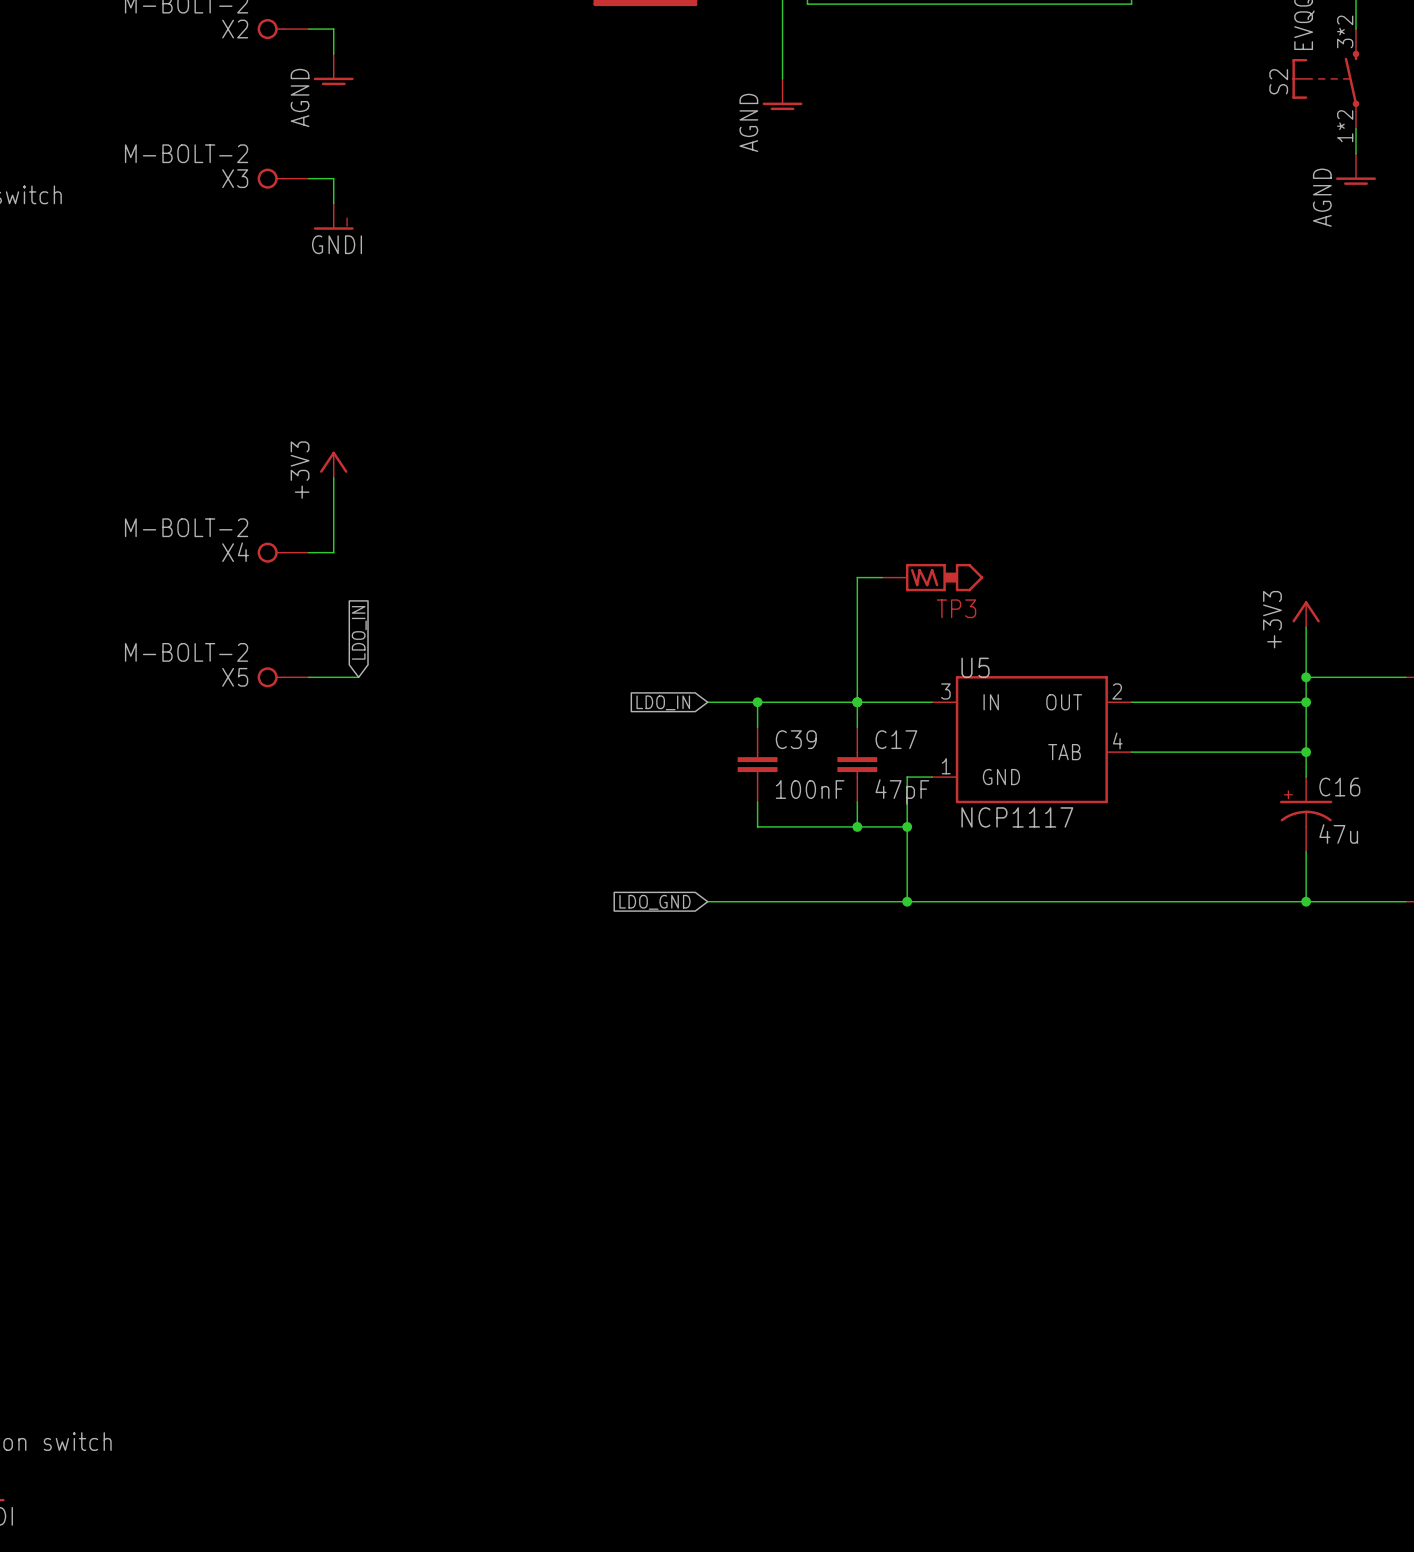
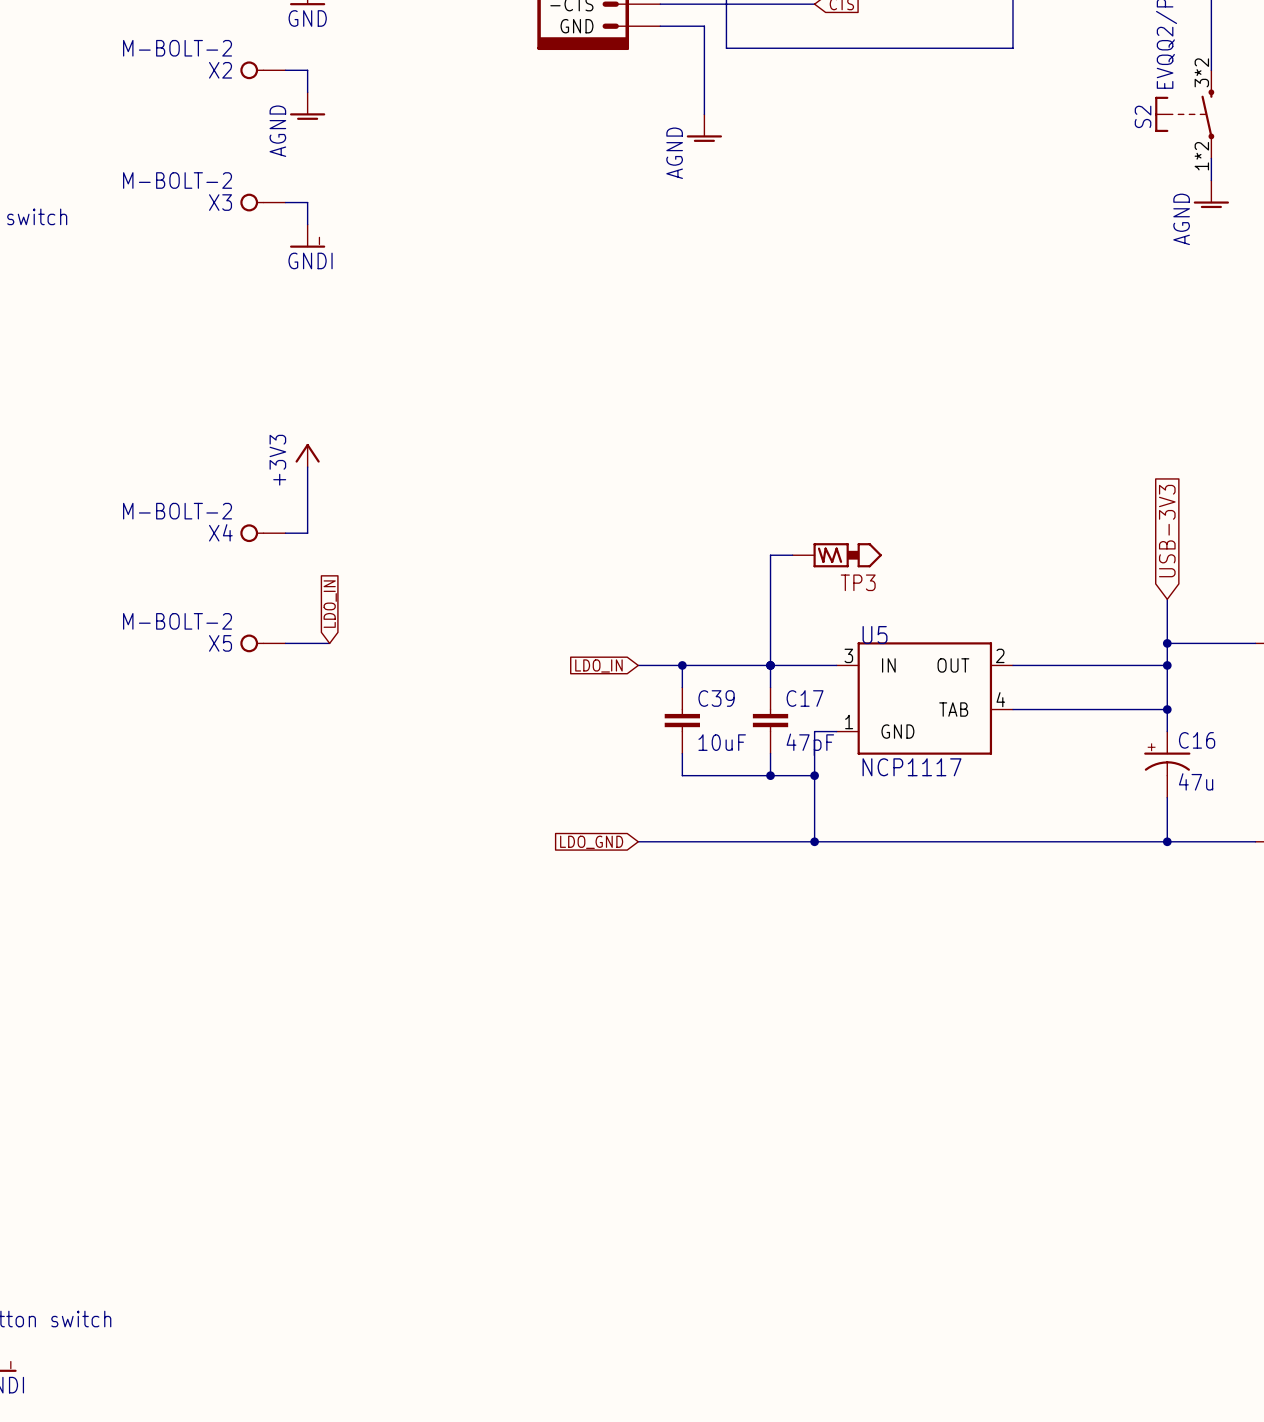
global label: none -> USB-3V3 (1167, 531)
power symbol: +3V3 (1306, 614) -> none
C39 value: 100nF (810, 789) -> 10uF (722, 742)

